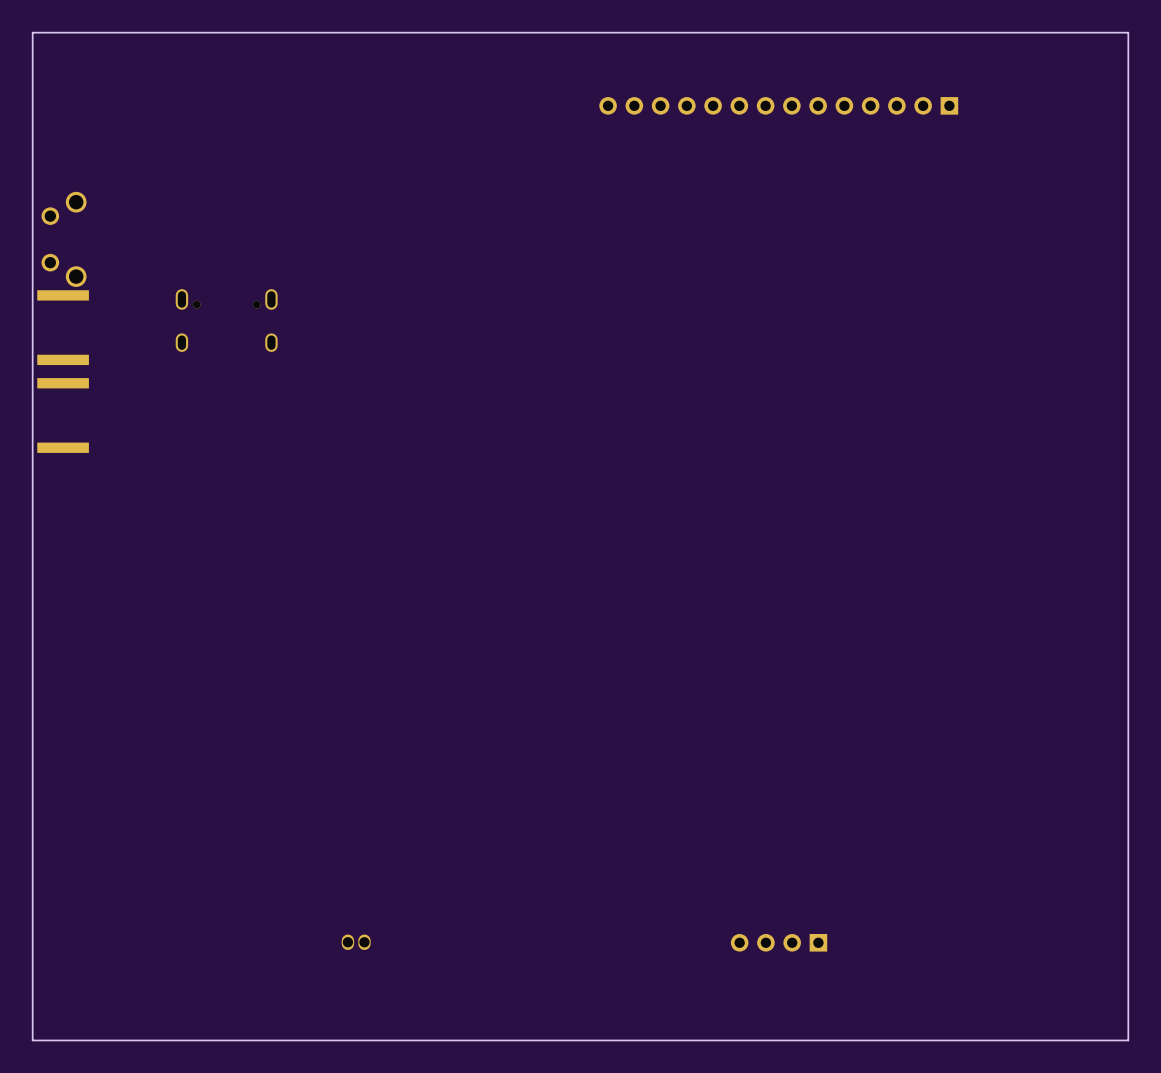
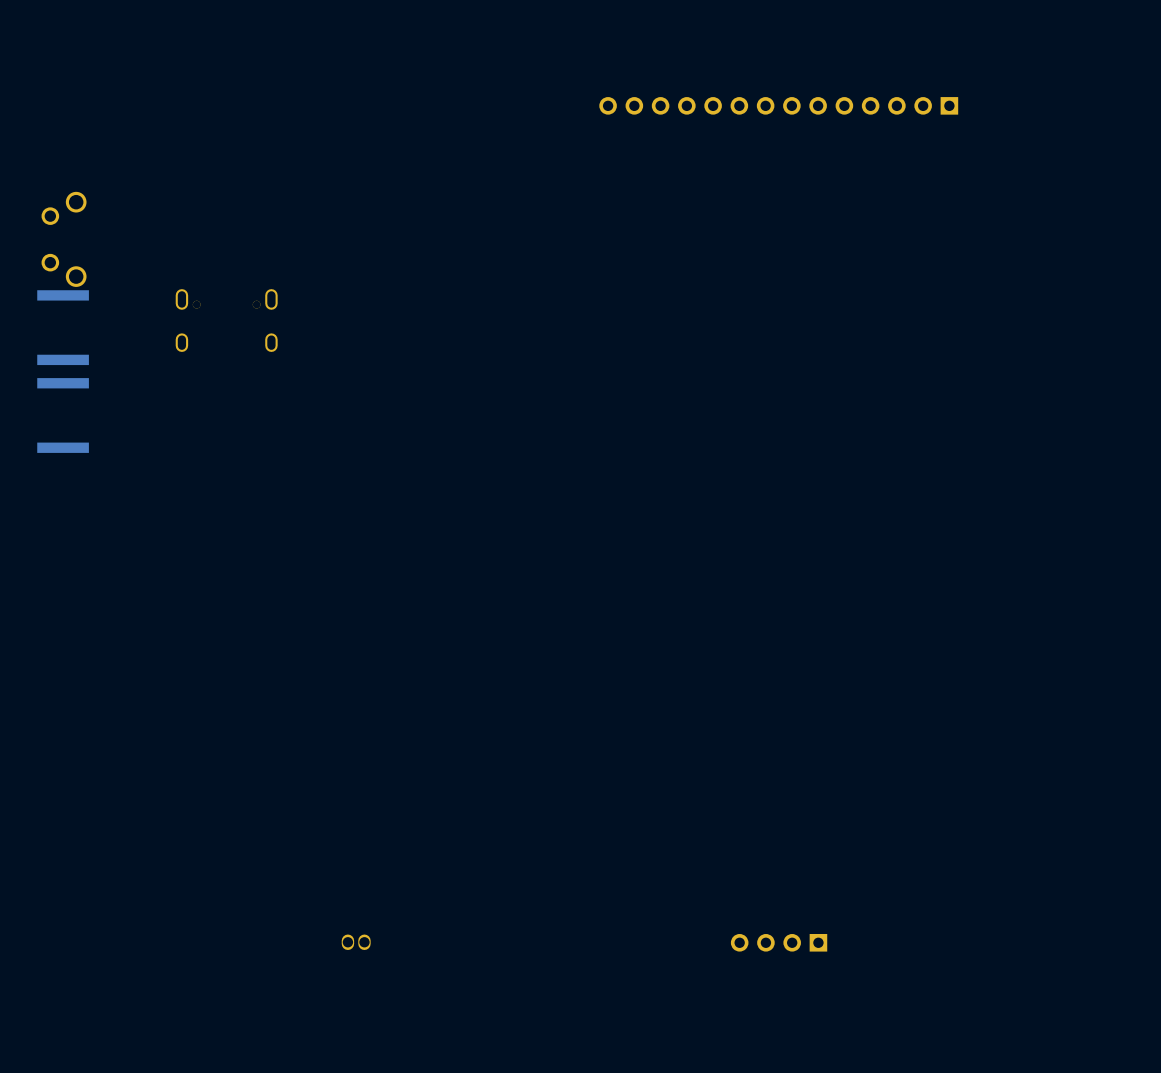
board edge: (1128, 32) (32, 32) (32, 1040) (1128, 1040) (1128, 32) -> none

